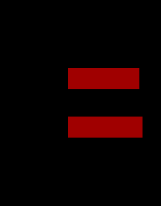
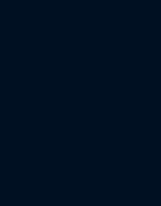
part: (105, 102) -> none

